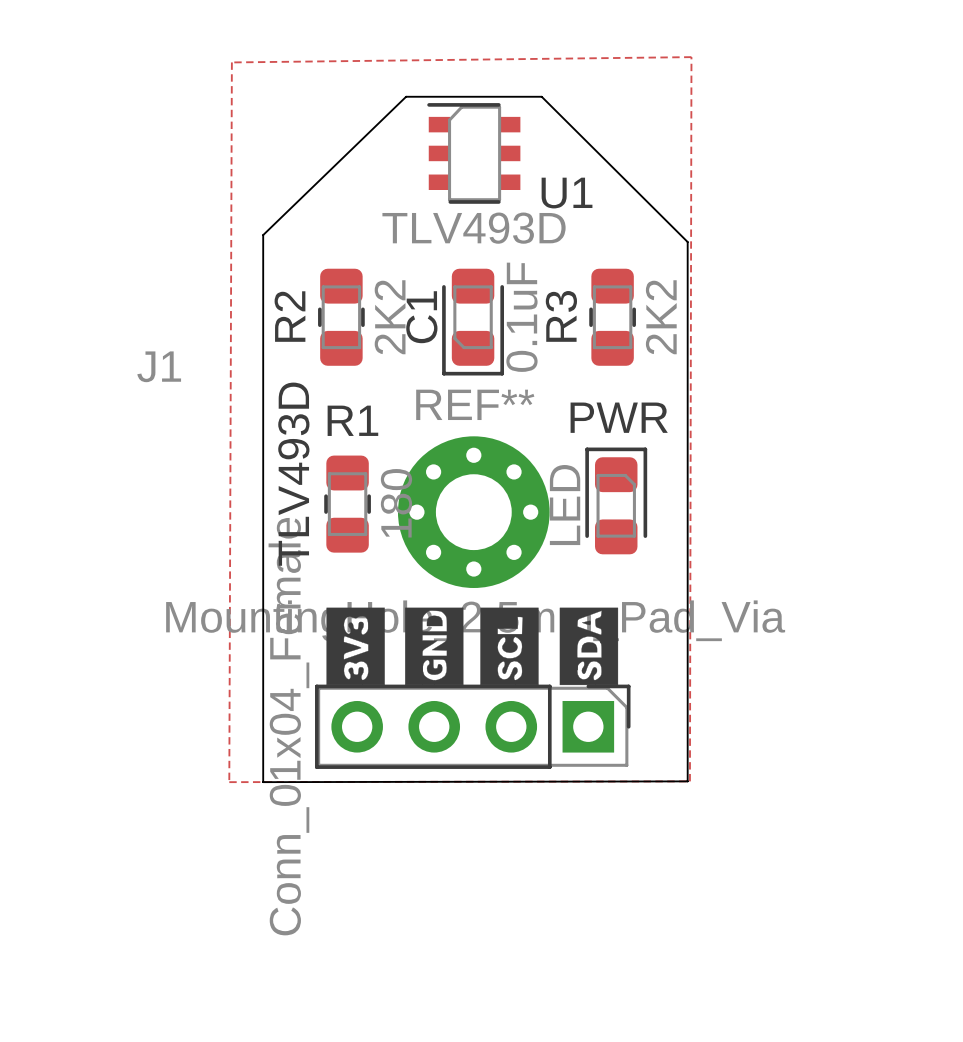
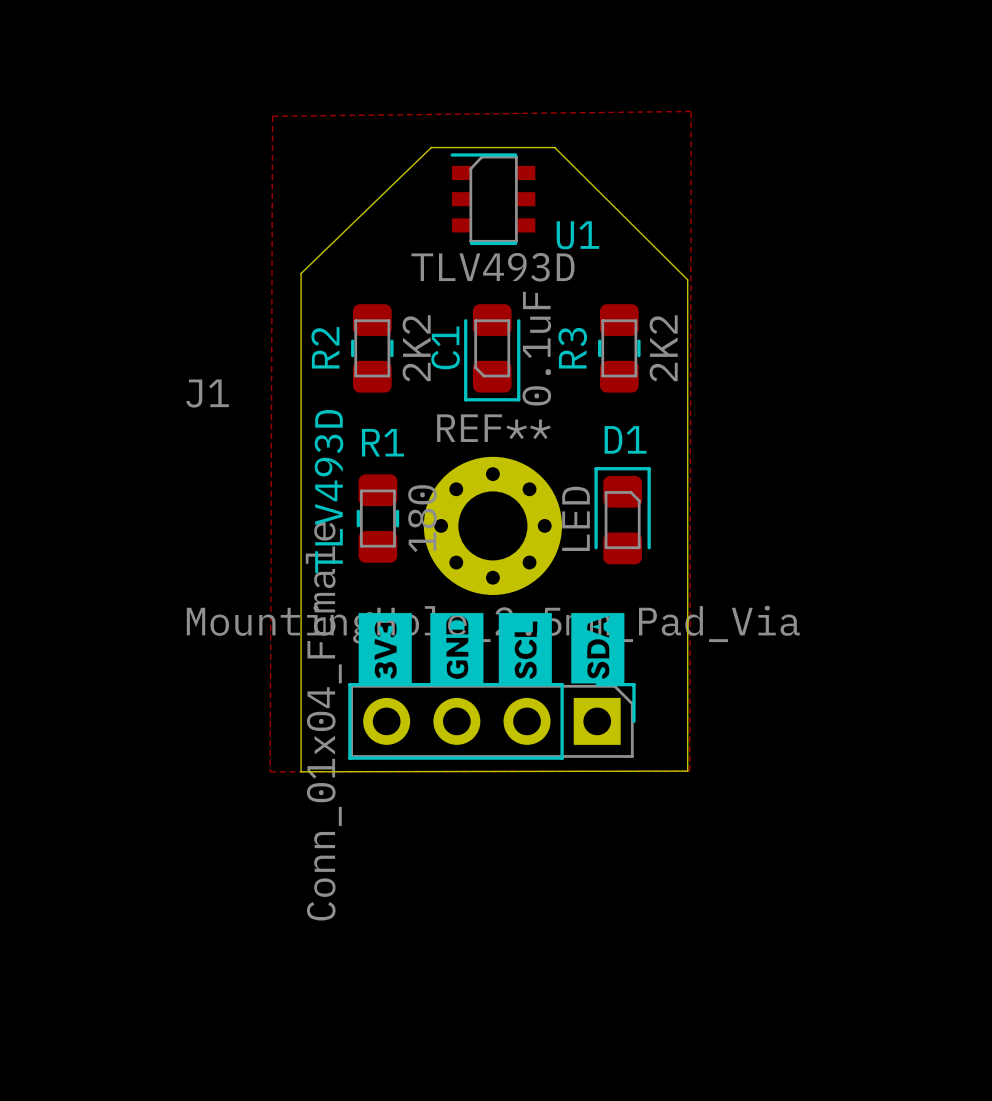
PWR name: PWR (619, 417) -> D1 (625, 439)

